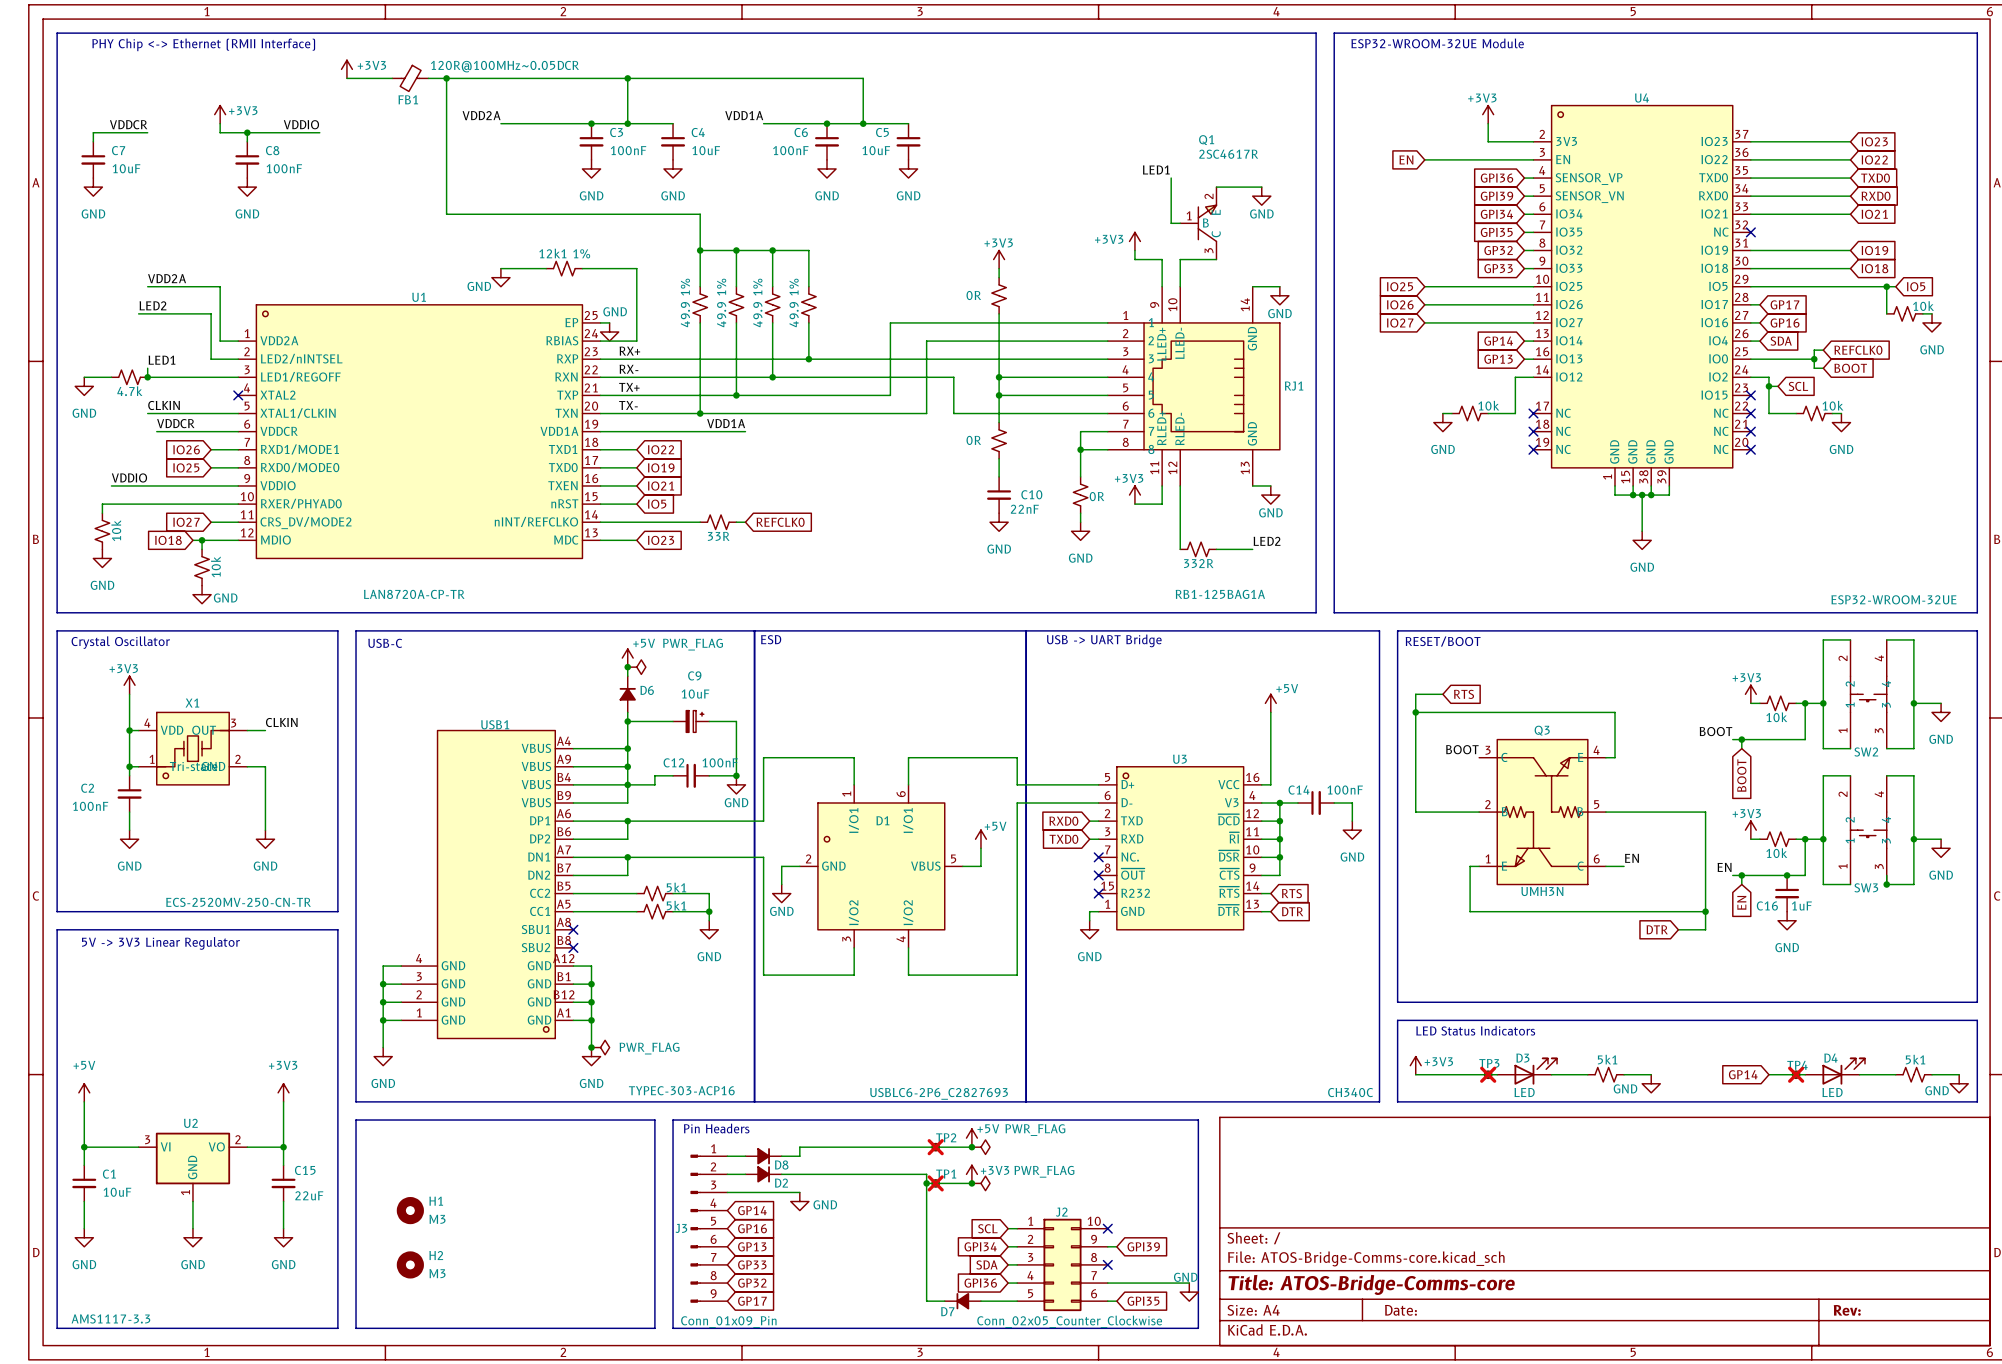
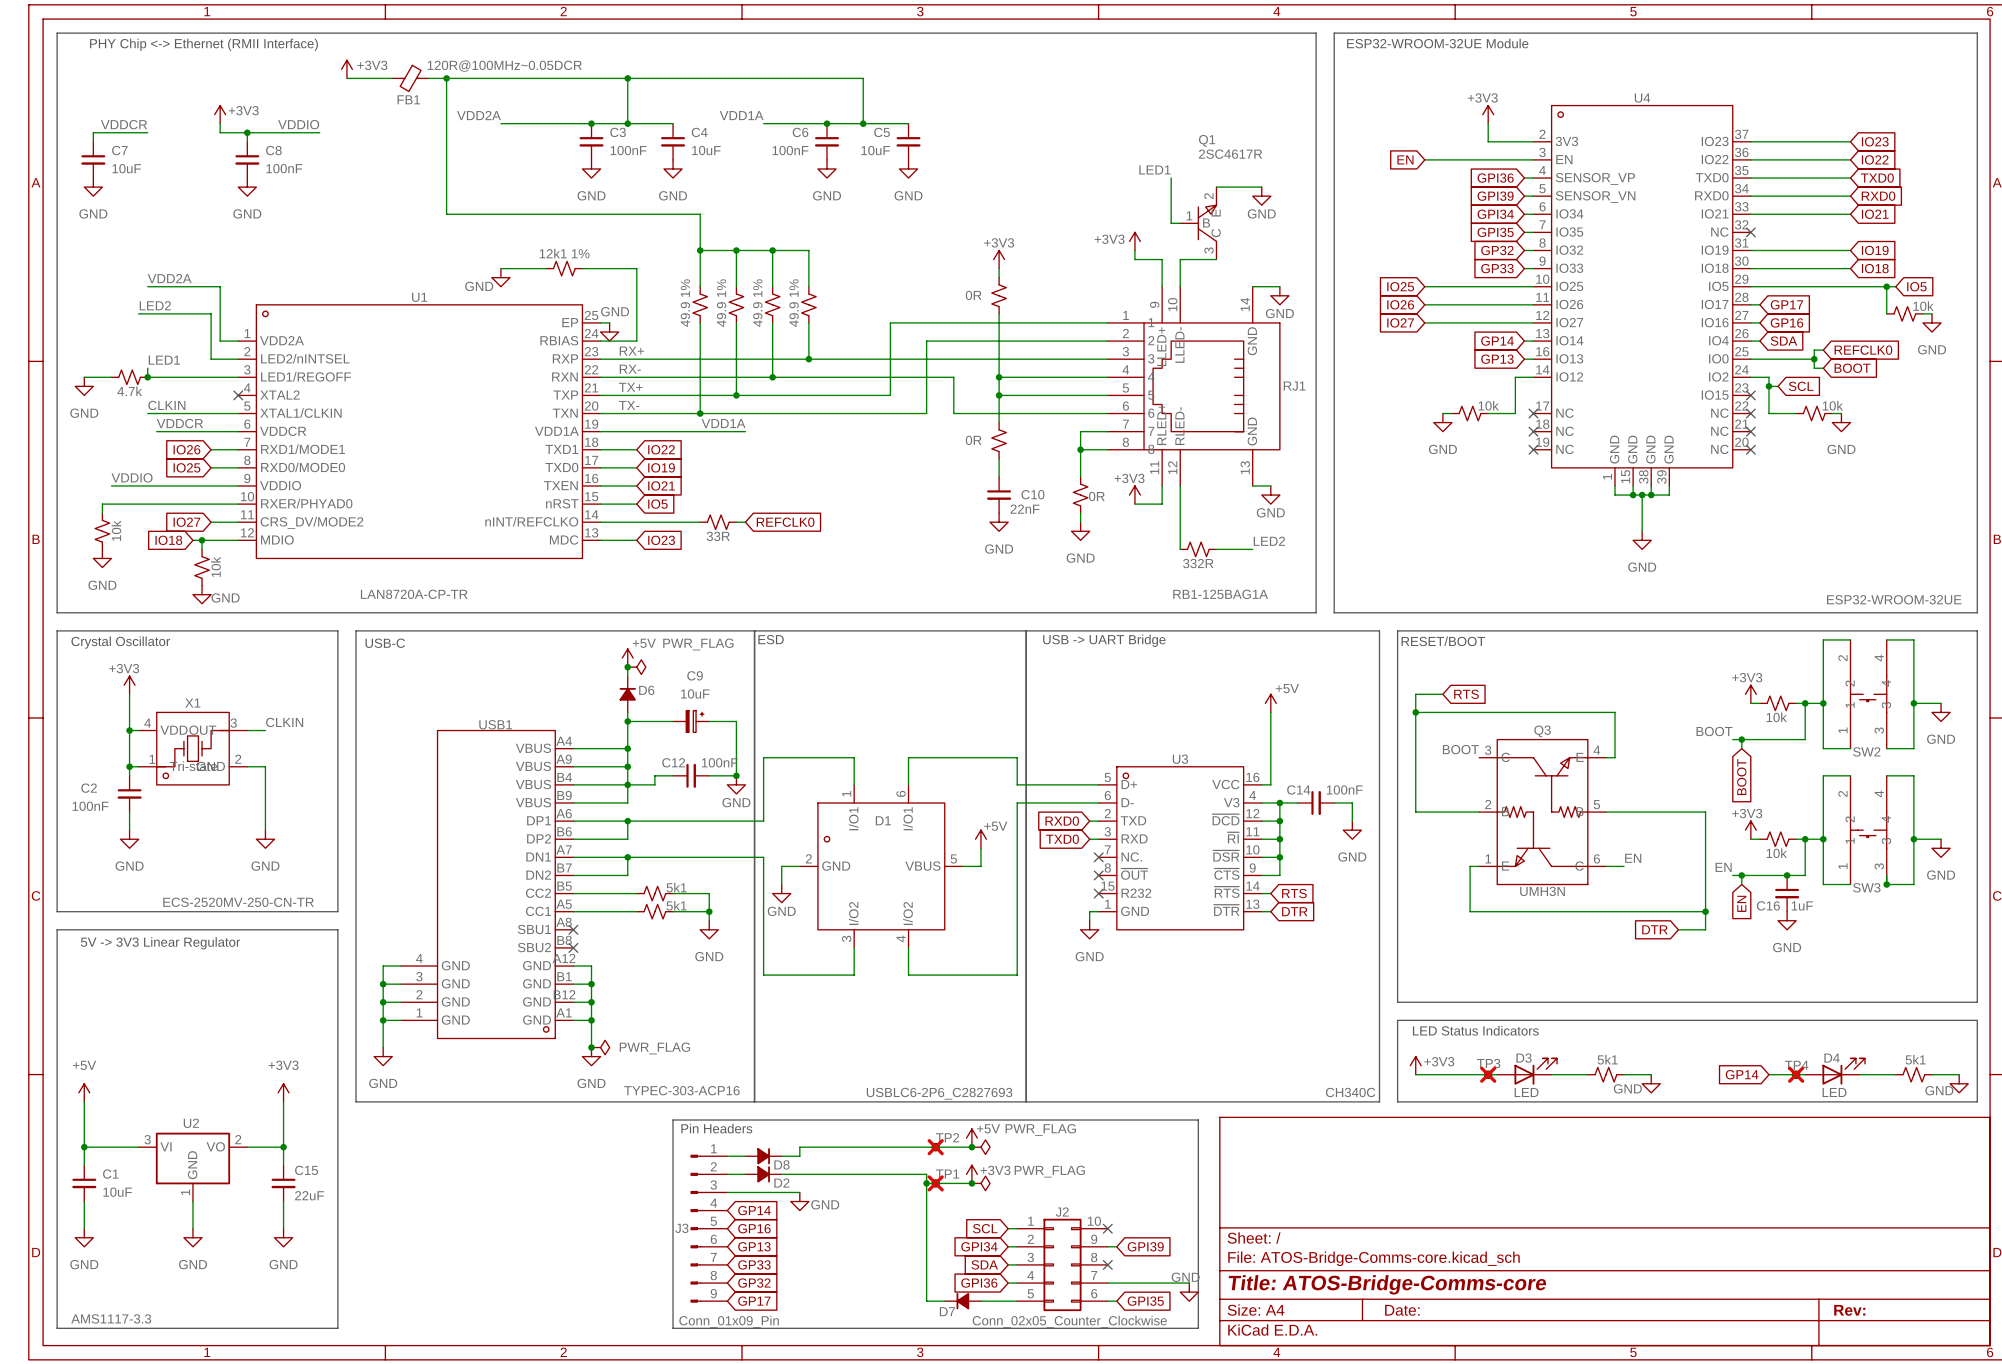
line: (356, 1120) (654, 1120) (654, 1328) (356, 1328) (356, 1120) -> none
H1: M3 (410, 1210) -> none
H2: M3 (410, 1264) -> none

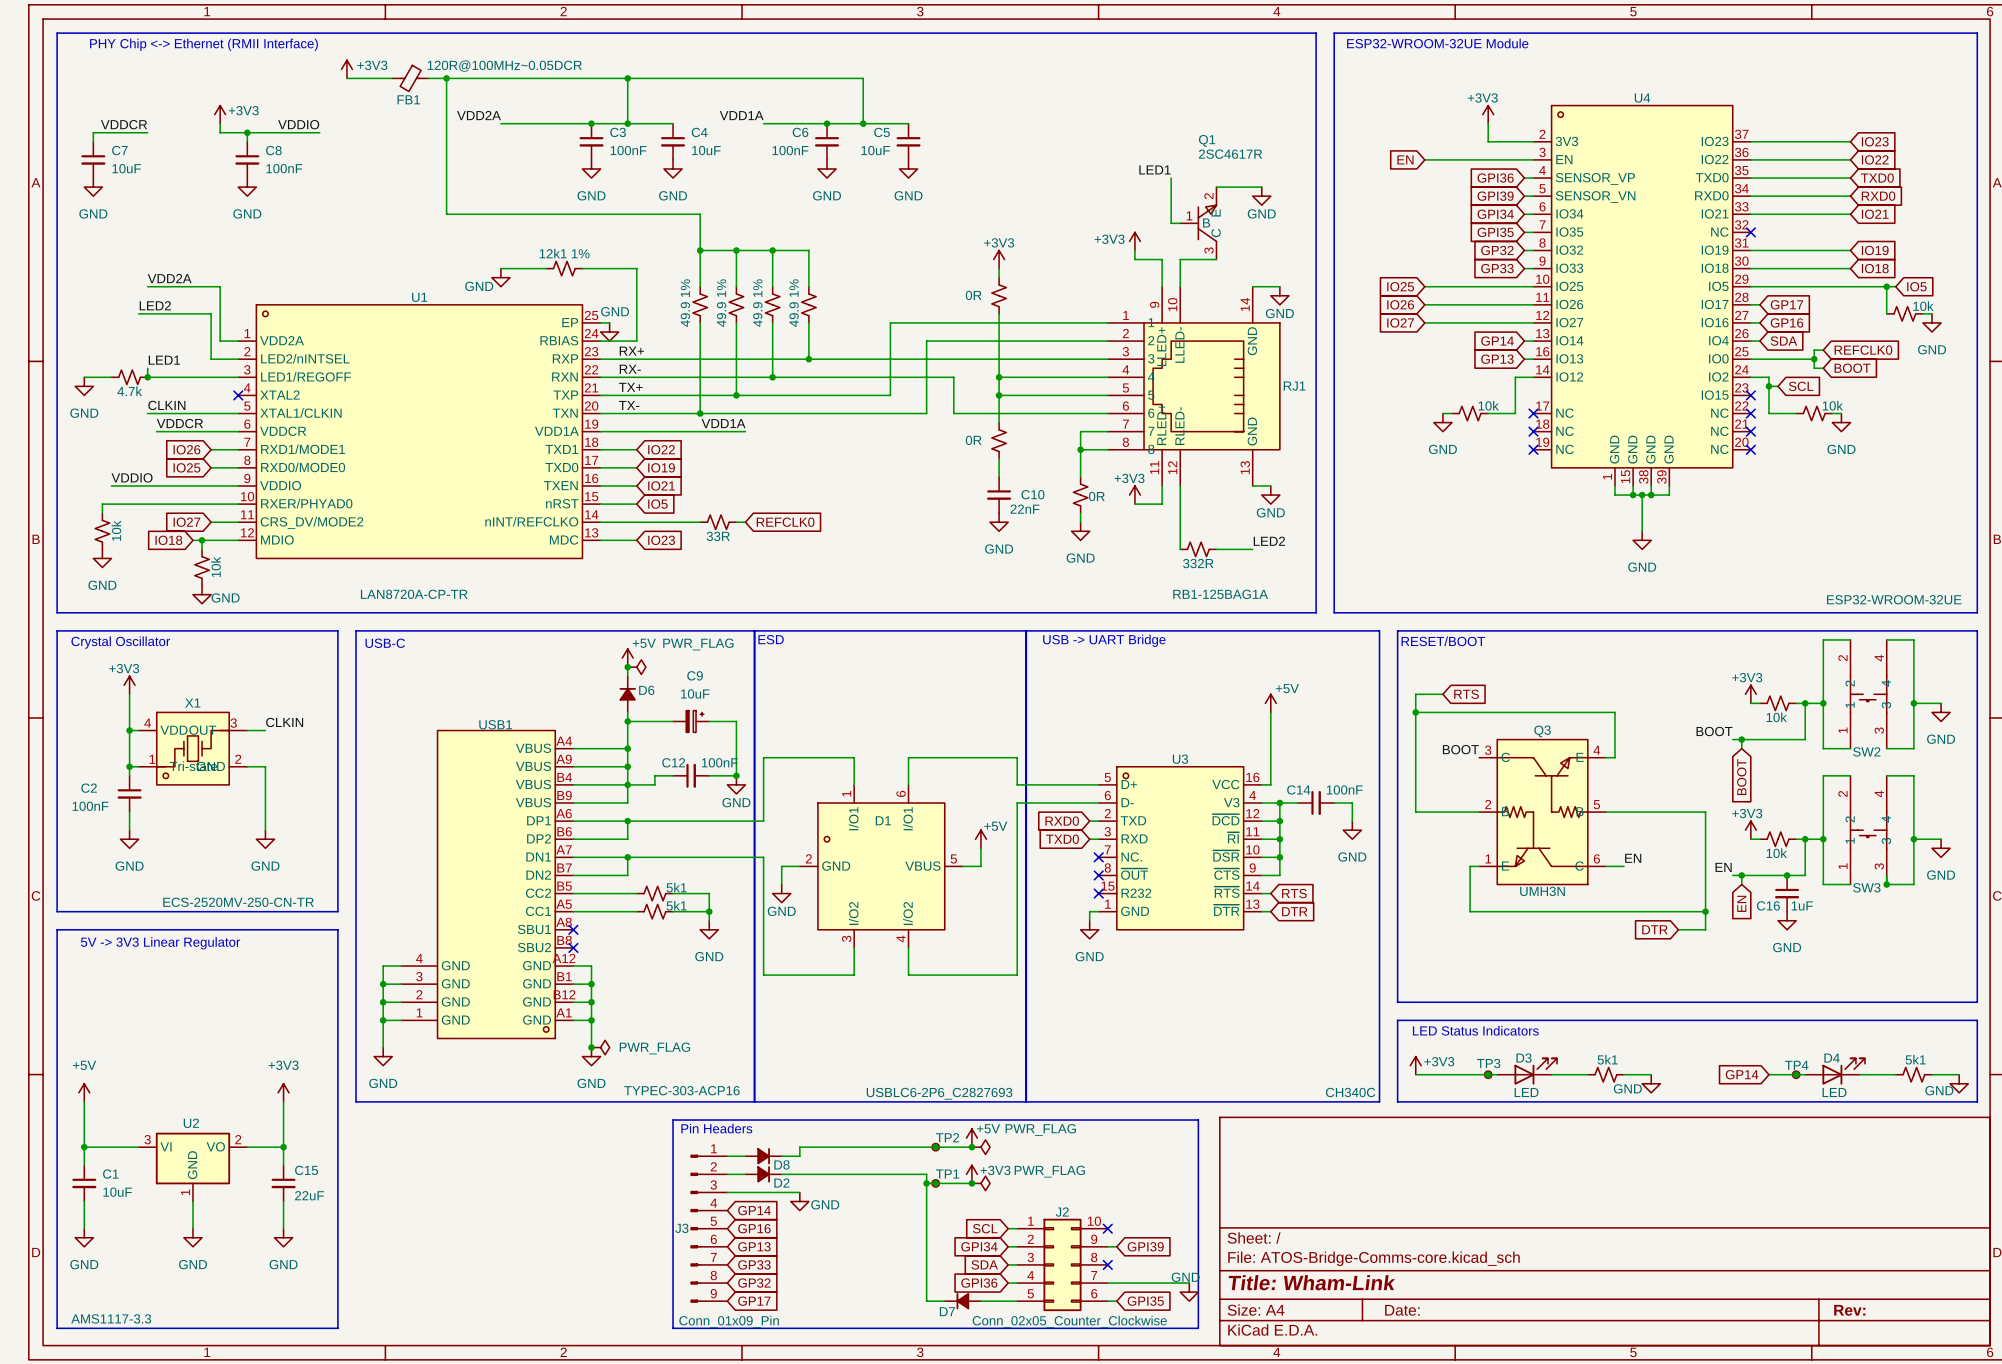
TP3 do-not-place cross: (1488, 1074) -> none
TP4 do-not-place cross: (1796, 1074) -> none
TP2 do-not-place cross: (935, 1147) -> none
TP1 do-not-place cross: (935, 1183) -> none
title block: Title: ATOS-Bridge-Comms-core (1387, 1284) -> Title: Wham-Link (1311, 1282)

